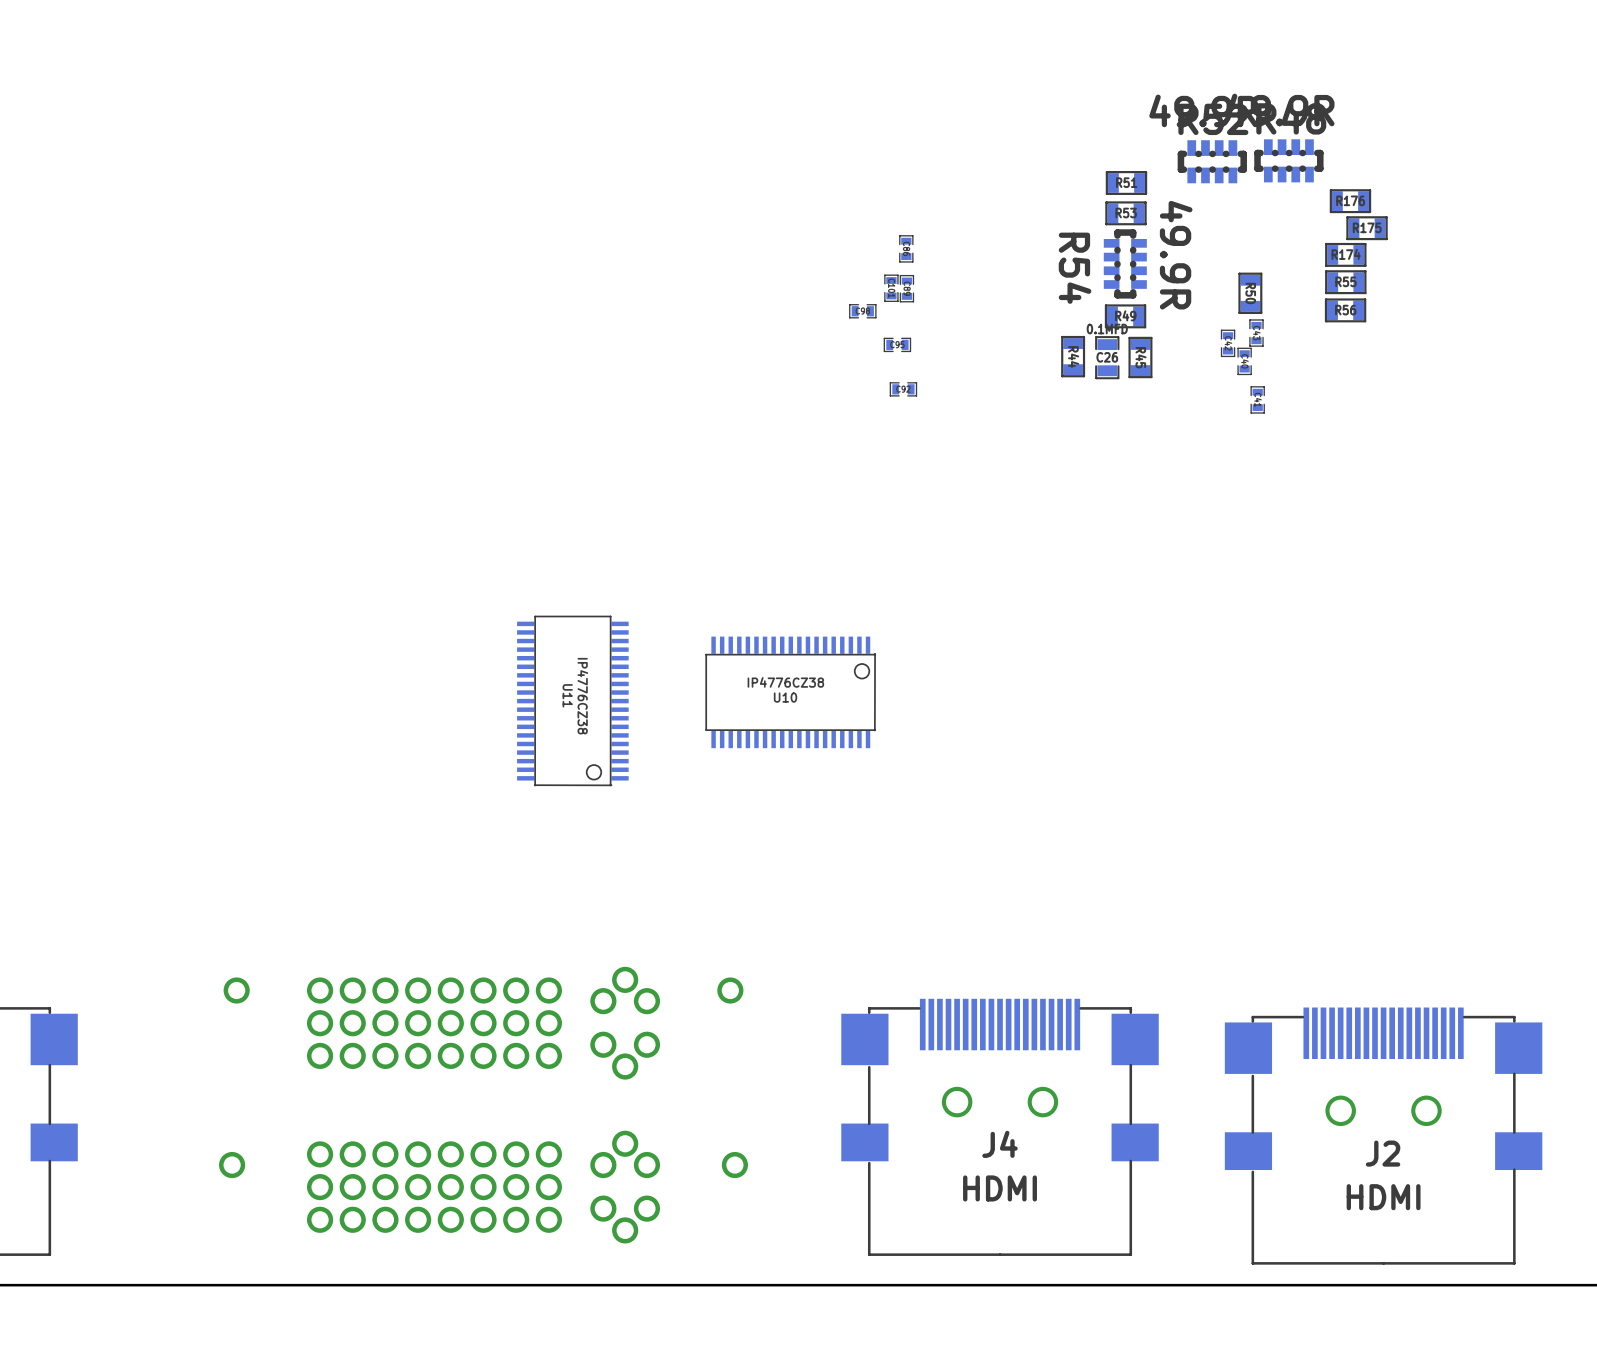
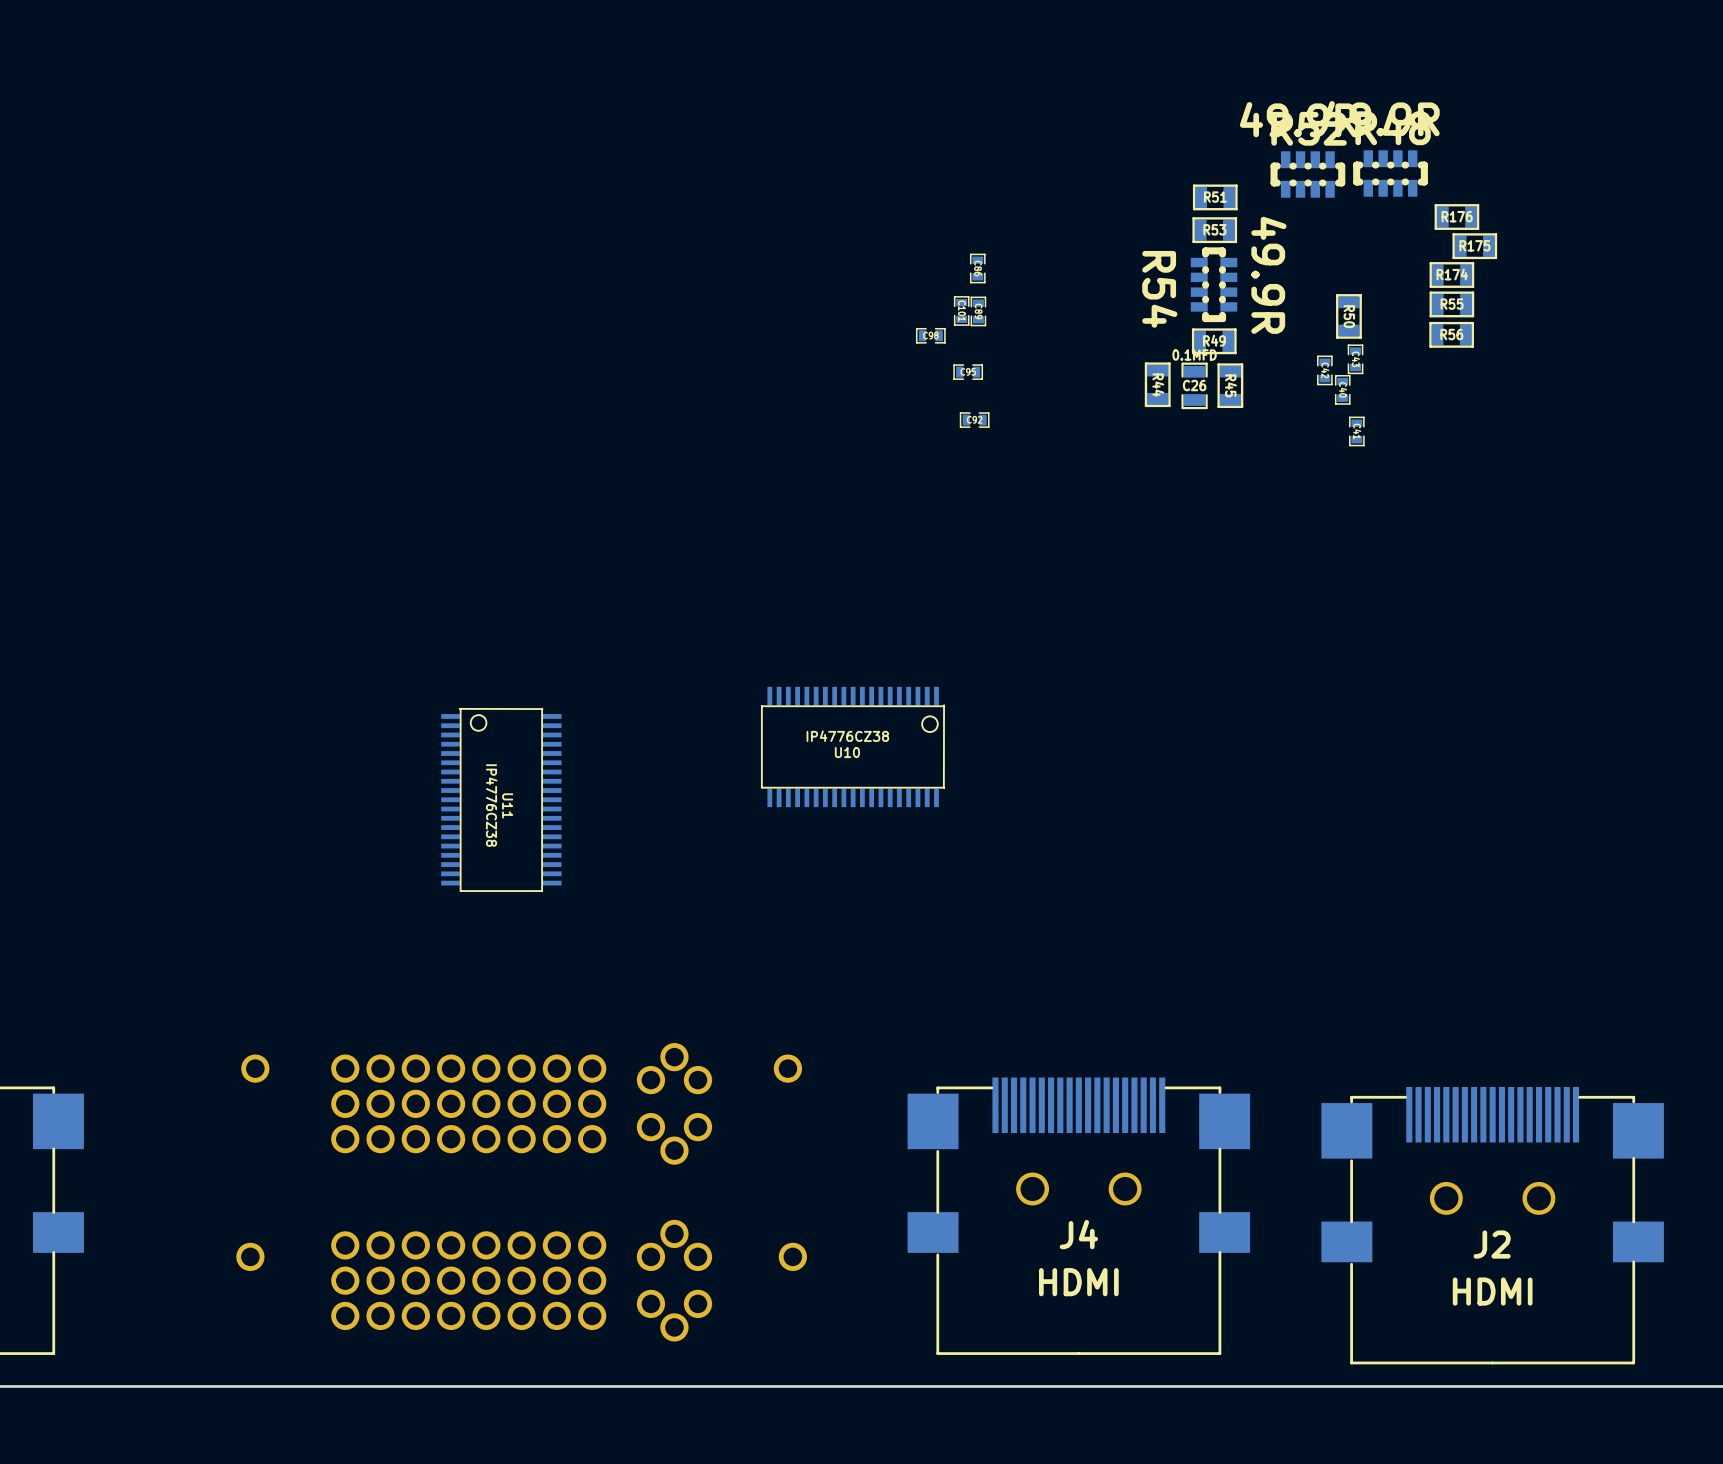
U11 rotation: 0° (572, 701) -> 180° (501, 799)
U11 position: (572, 701) -> (501, 799)

